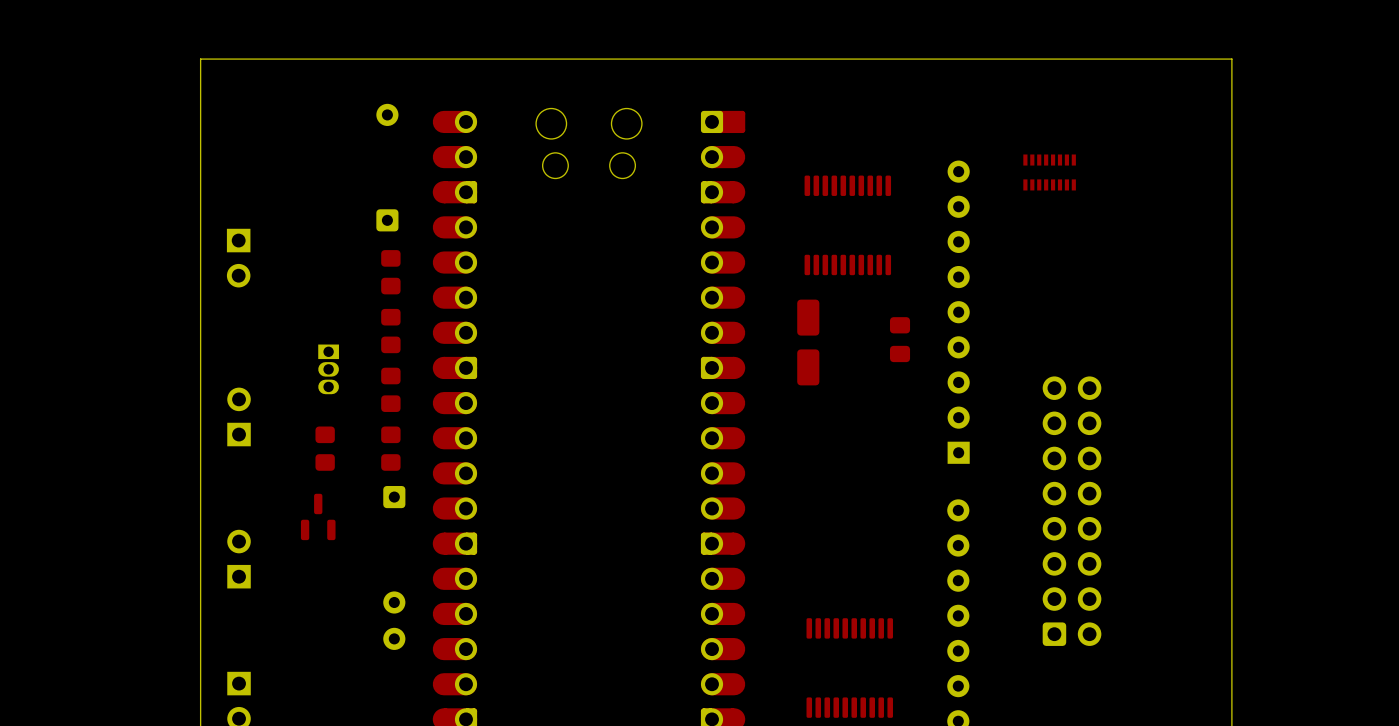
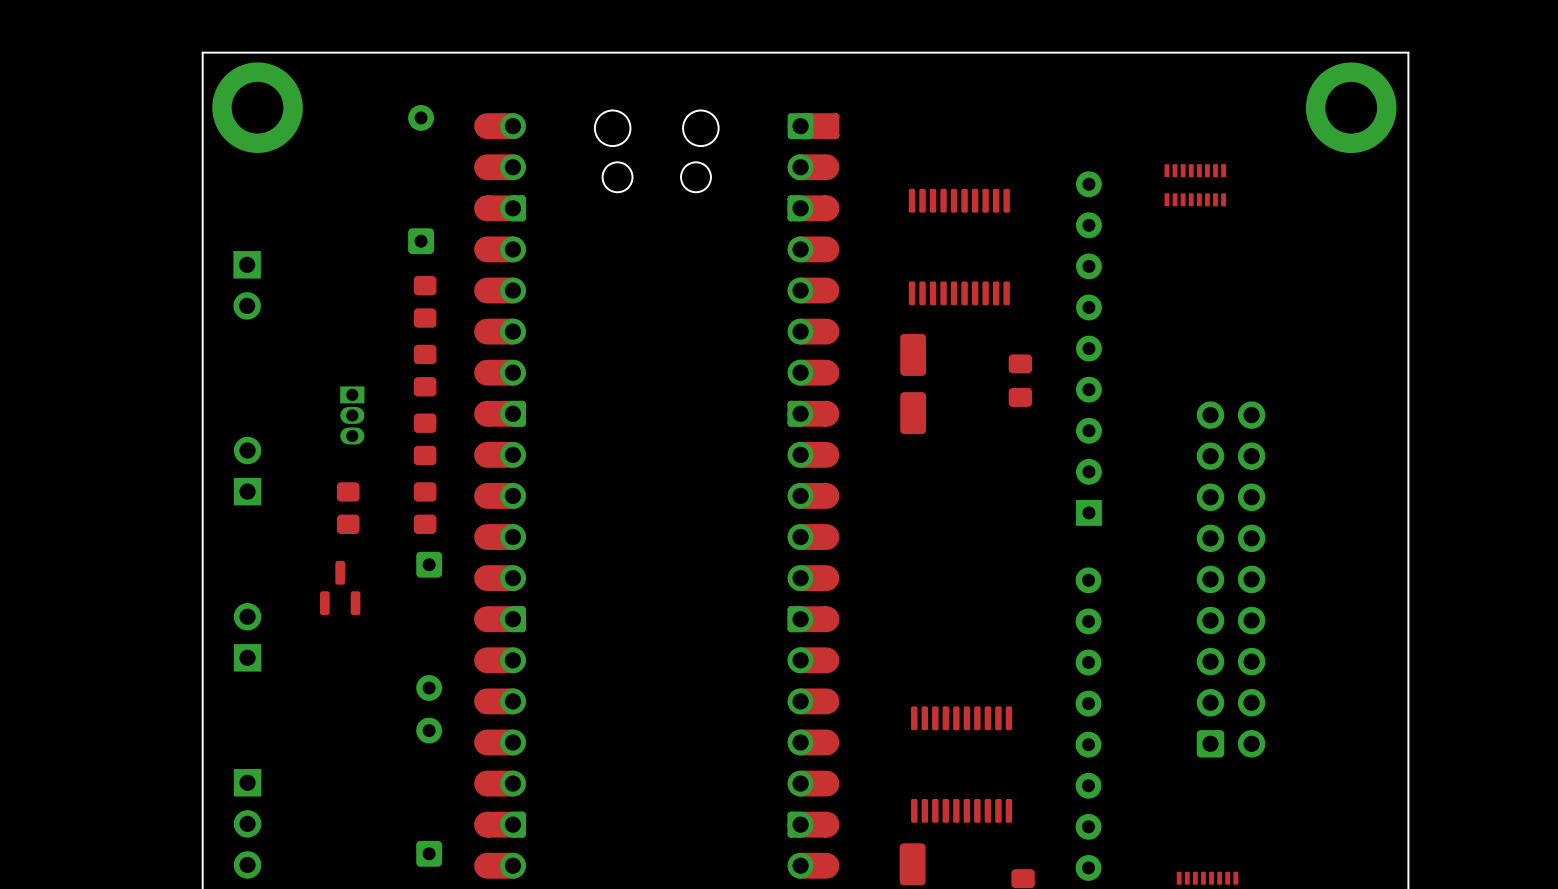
part: none -> (257, 107)
part: none -> (1351, 107)
part footprint: [1042, 376, 1102, 646] -> [1196, 401, 1266, 758]

